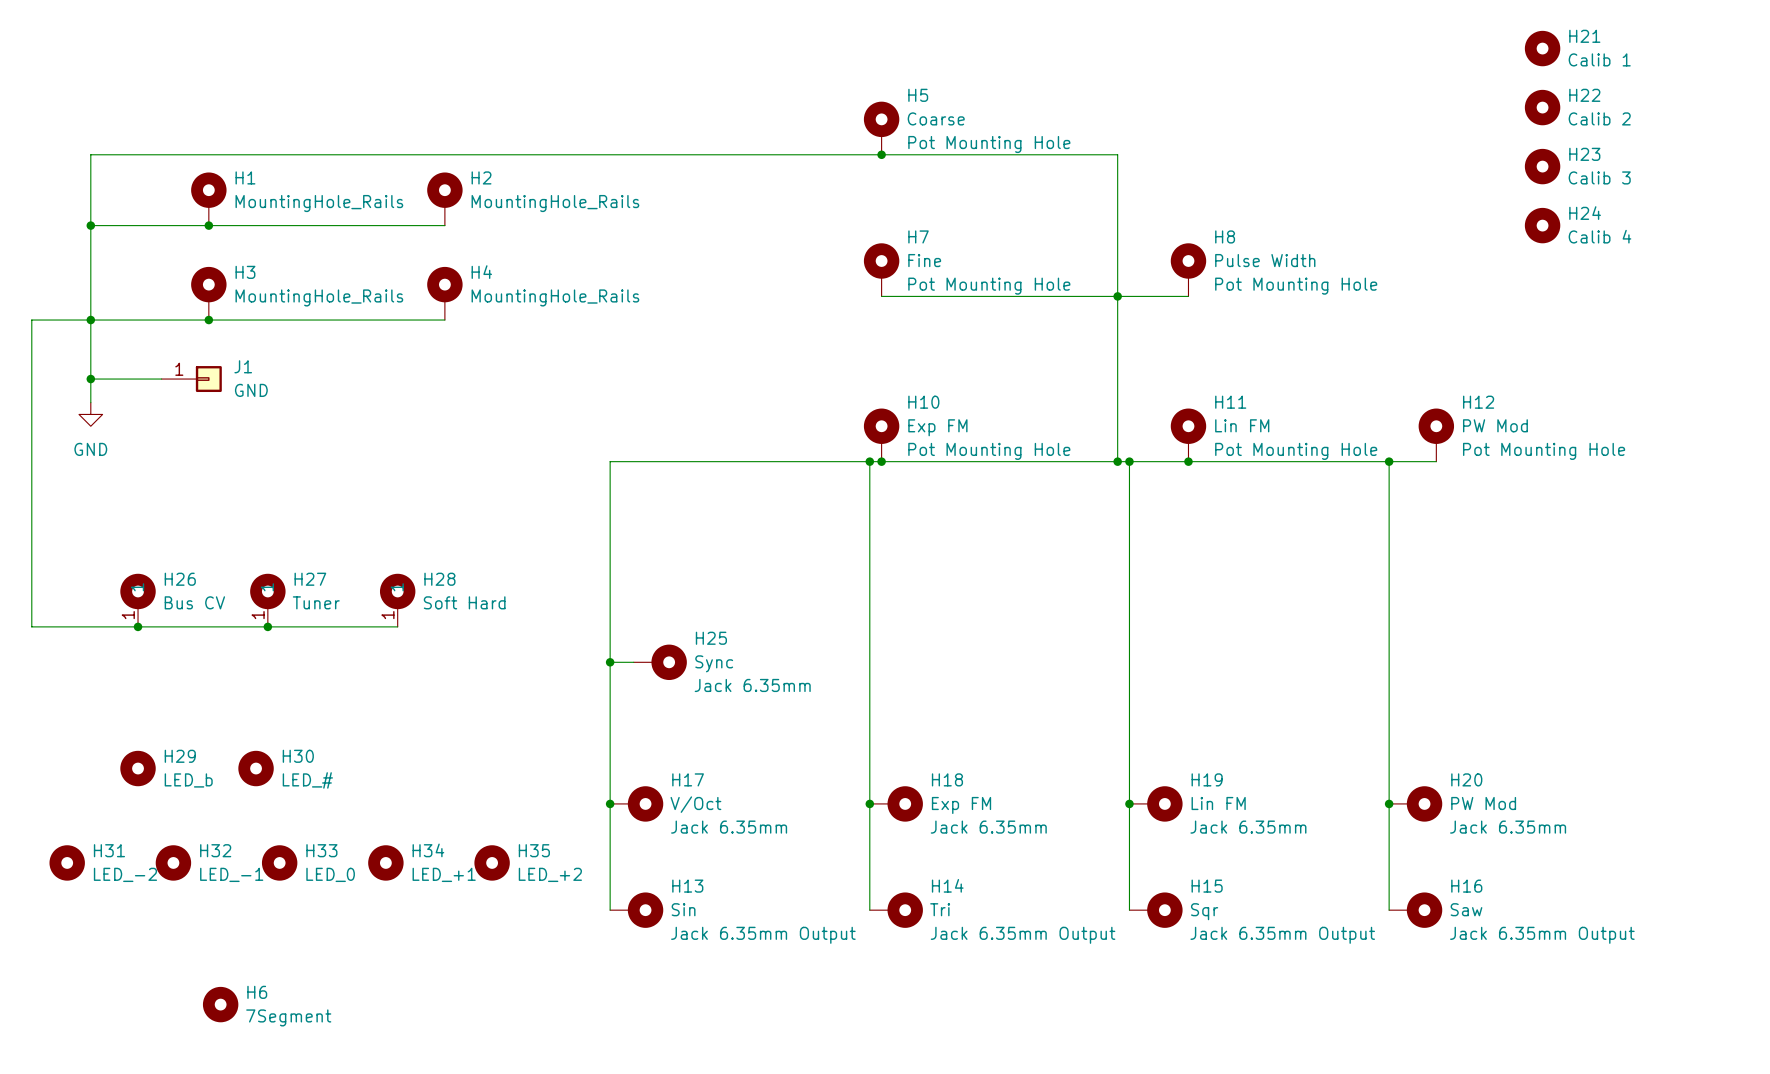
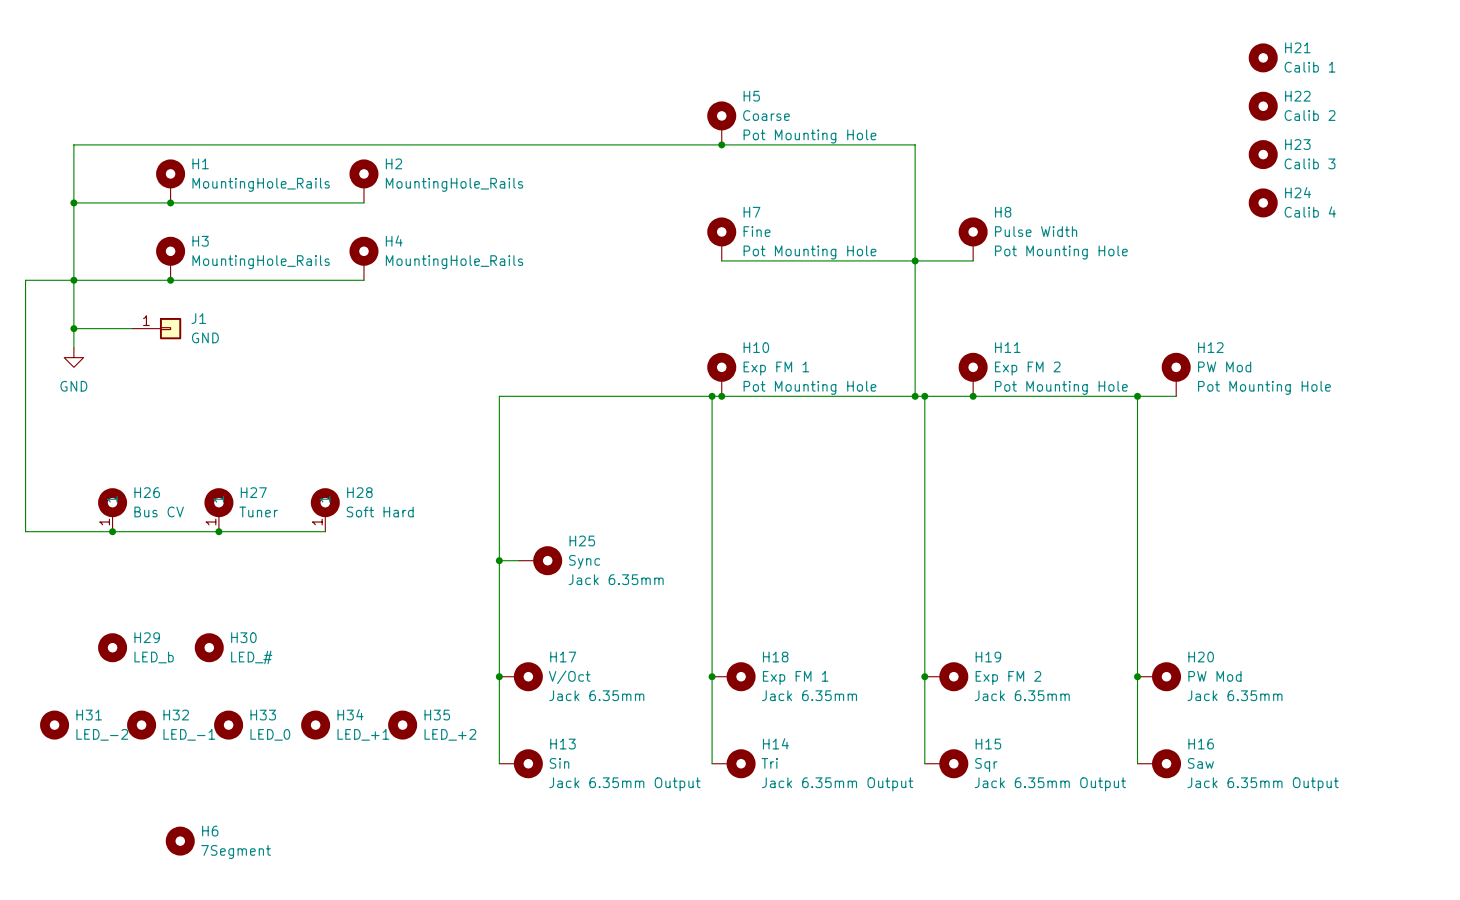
H11 value: Lin FM (1242, 425) -> Exp FM 2 (1027, 368)
H10 value: Exp FM (937, 427) -> Exp FM 1 (776, 368)
H19 value: Lin FM (1218, 803) -> Exp FM 2 (1008, 677)
H18 value: Exp FM (961, 805) -> Exp FM 1 (795, 677)

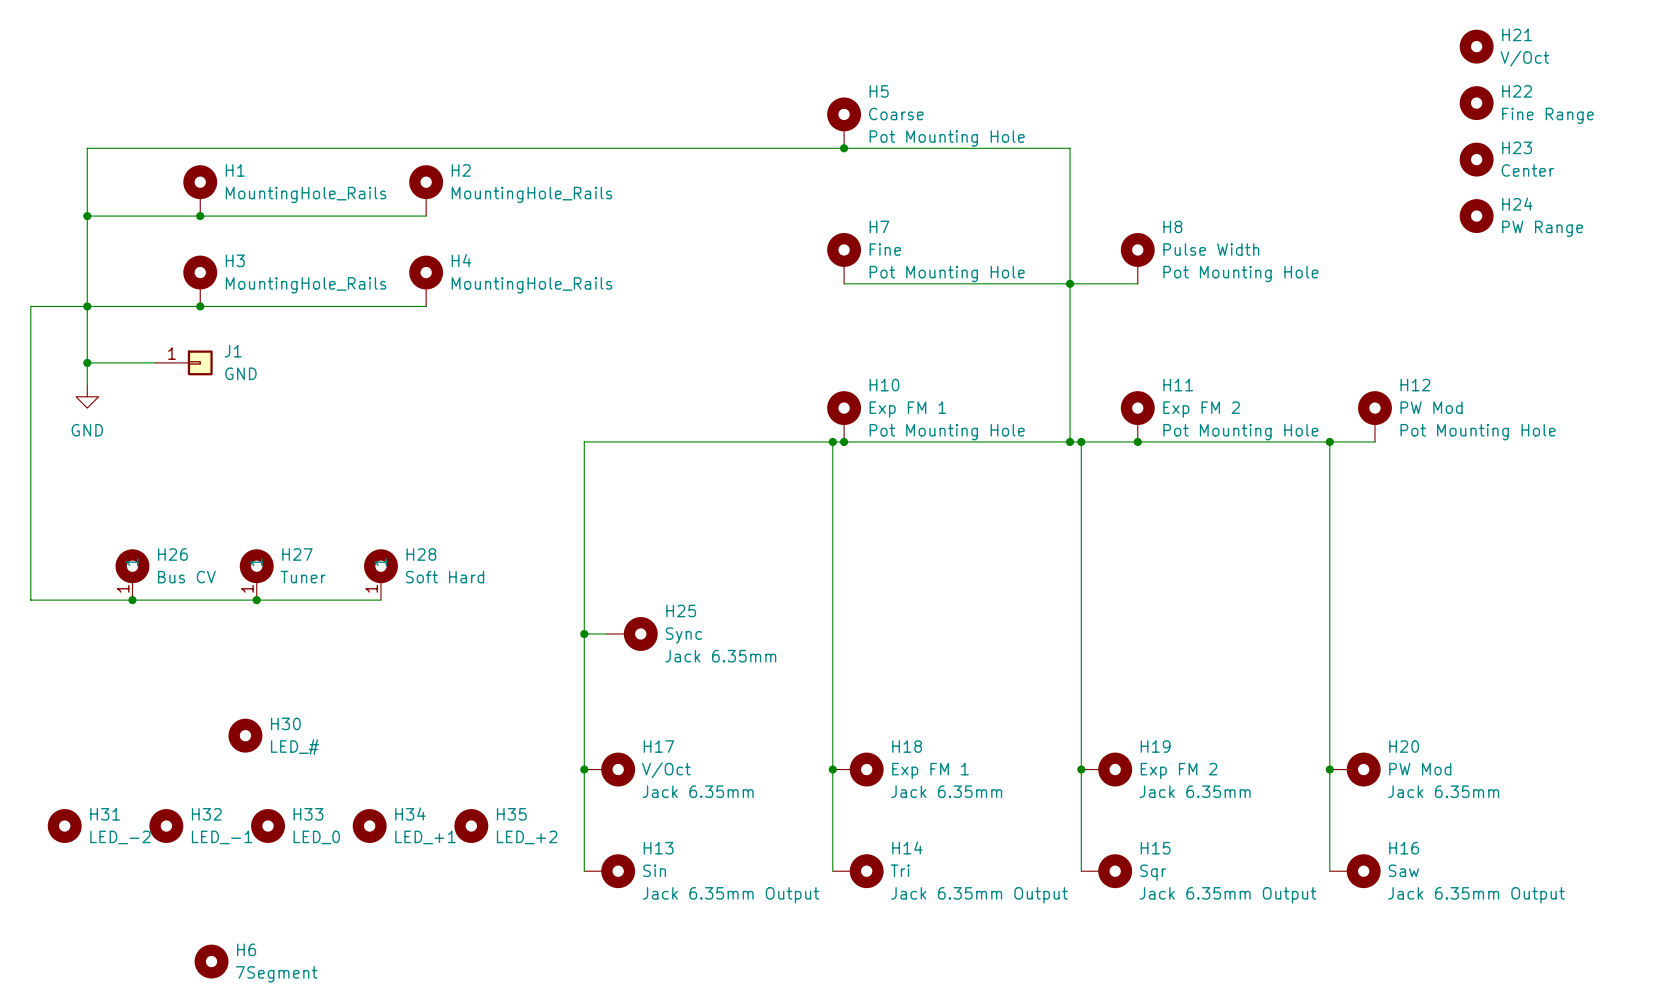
H21 value: Calib 1 (1310, 67) -> V/Oct (1524, 58)
H22 value: Calib 2 (1310, 115) -> Fine Range (1547, 115)
H23 value: Calib 3 (1310, 163) -> Center (1527, 170)
H24 value: Calib 4 (1310, 212) -> PW Range (1542, 228)
H29: LED_b (112, 647) -> none

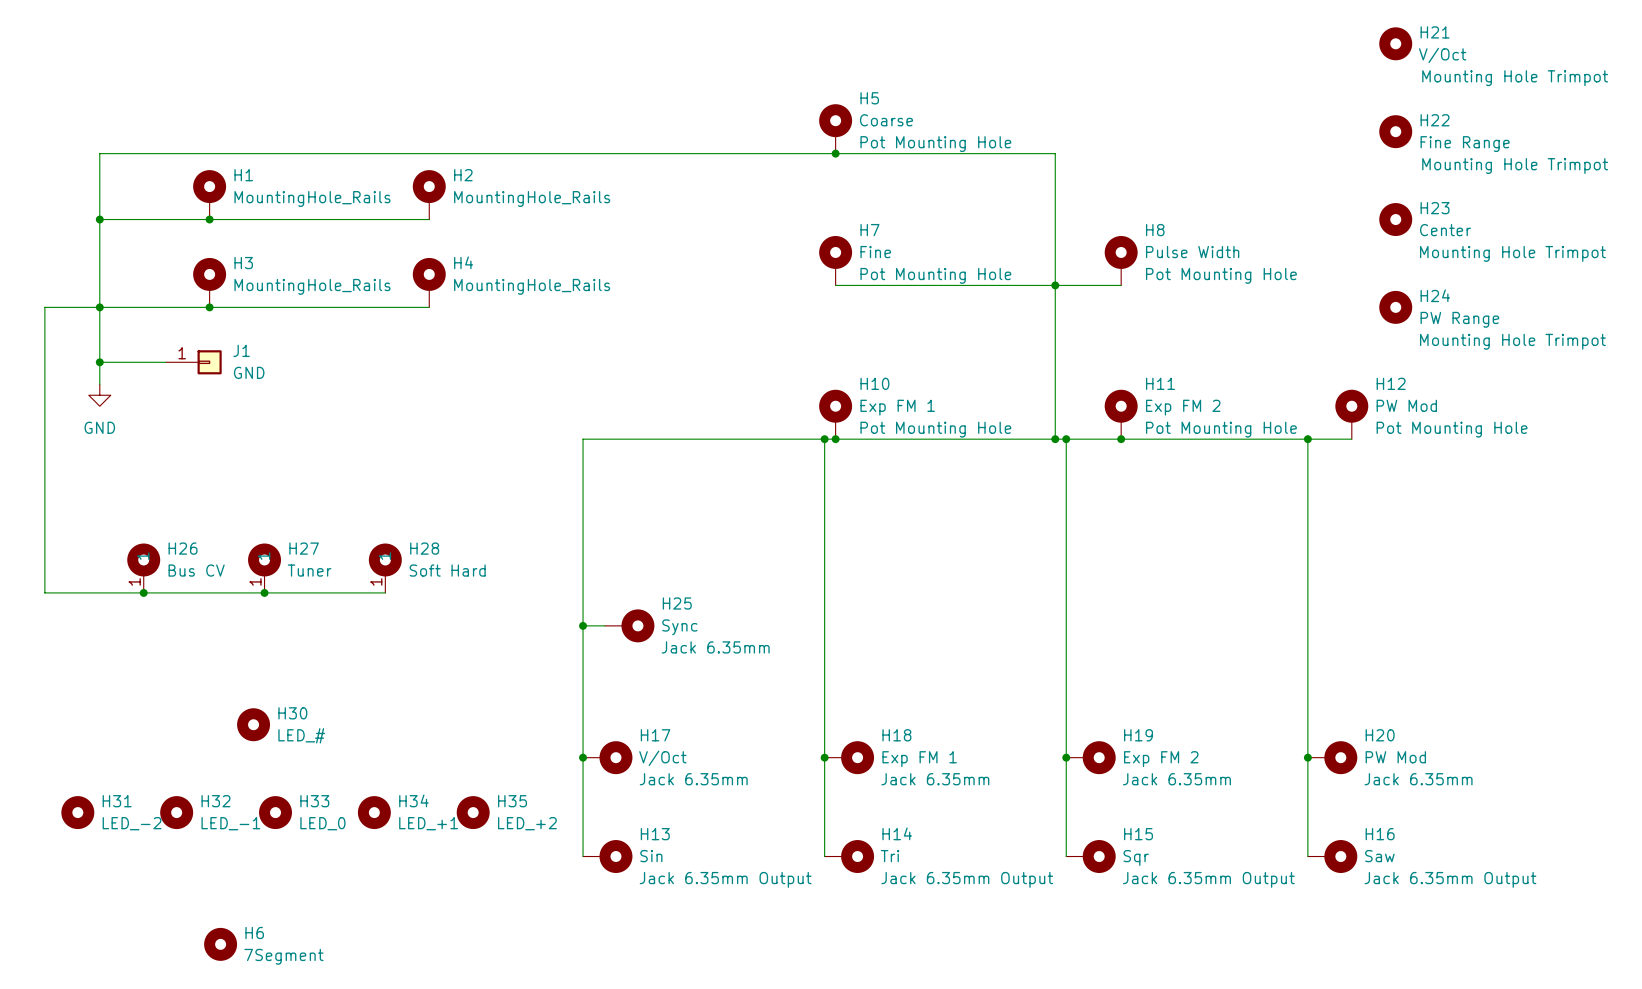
H21 position: (1476, 46) -> (1395, 43)
H21 text: none -> Mounting Hole Trimpot (1515, 78)
H22 position: (1476, 103) -> (1395, 131)
H23 position: (1476, 159) -> (1395, 219)
H22 text: none -> Mounting Hole Trimpot (1515, 166)
H24 position: (1476, 216) -> (1395, 307)
H23 text: none -> Mounting Hole Trimpot (1512, 253)
H24 text: none -> Mounting Hole Trimpot (1512, 341)

